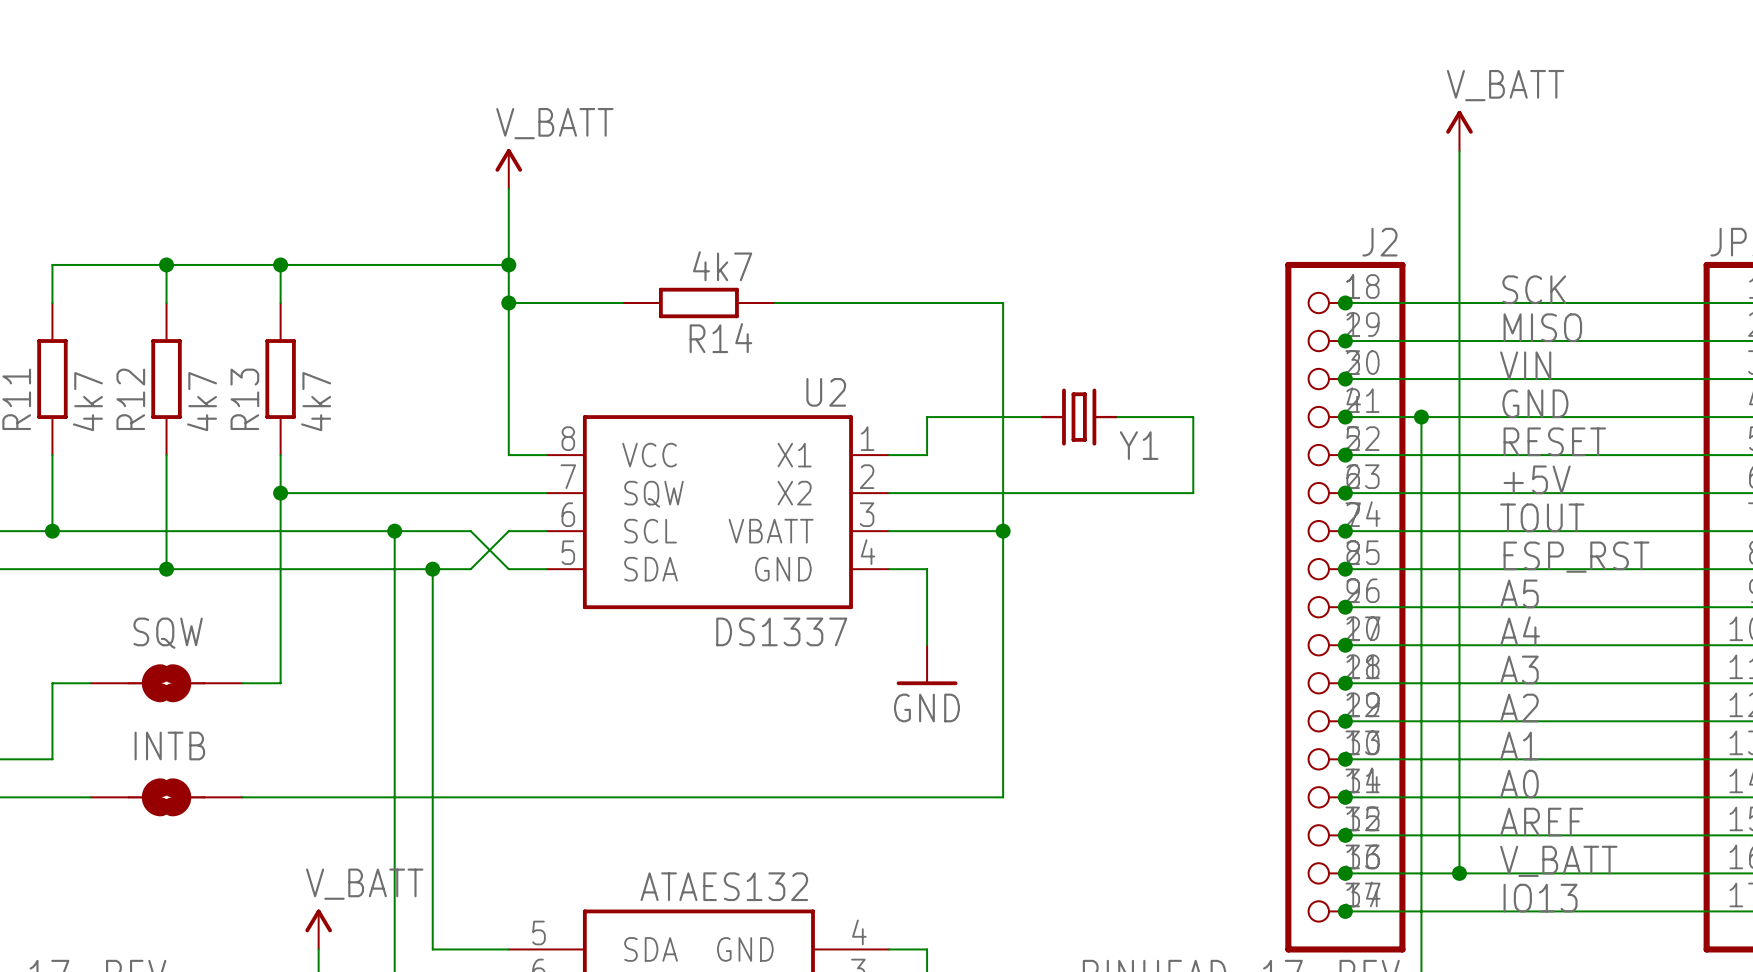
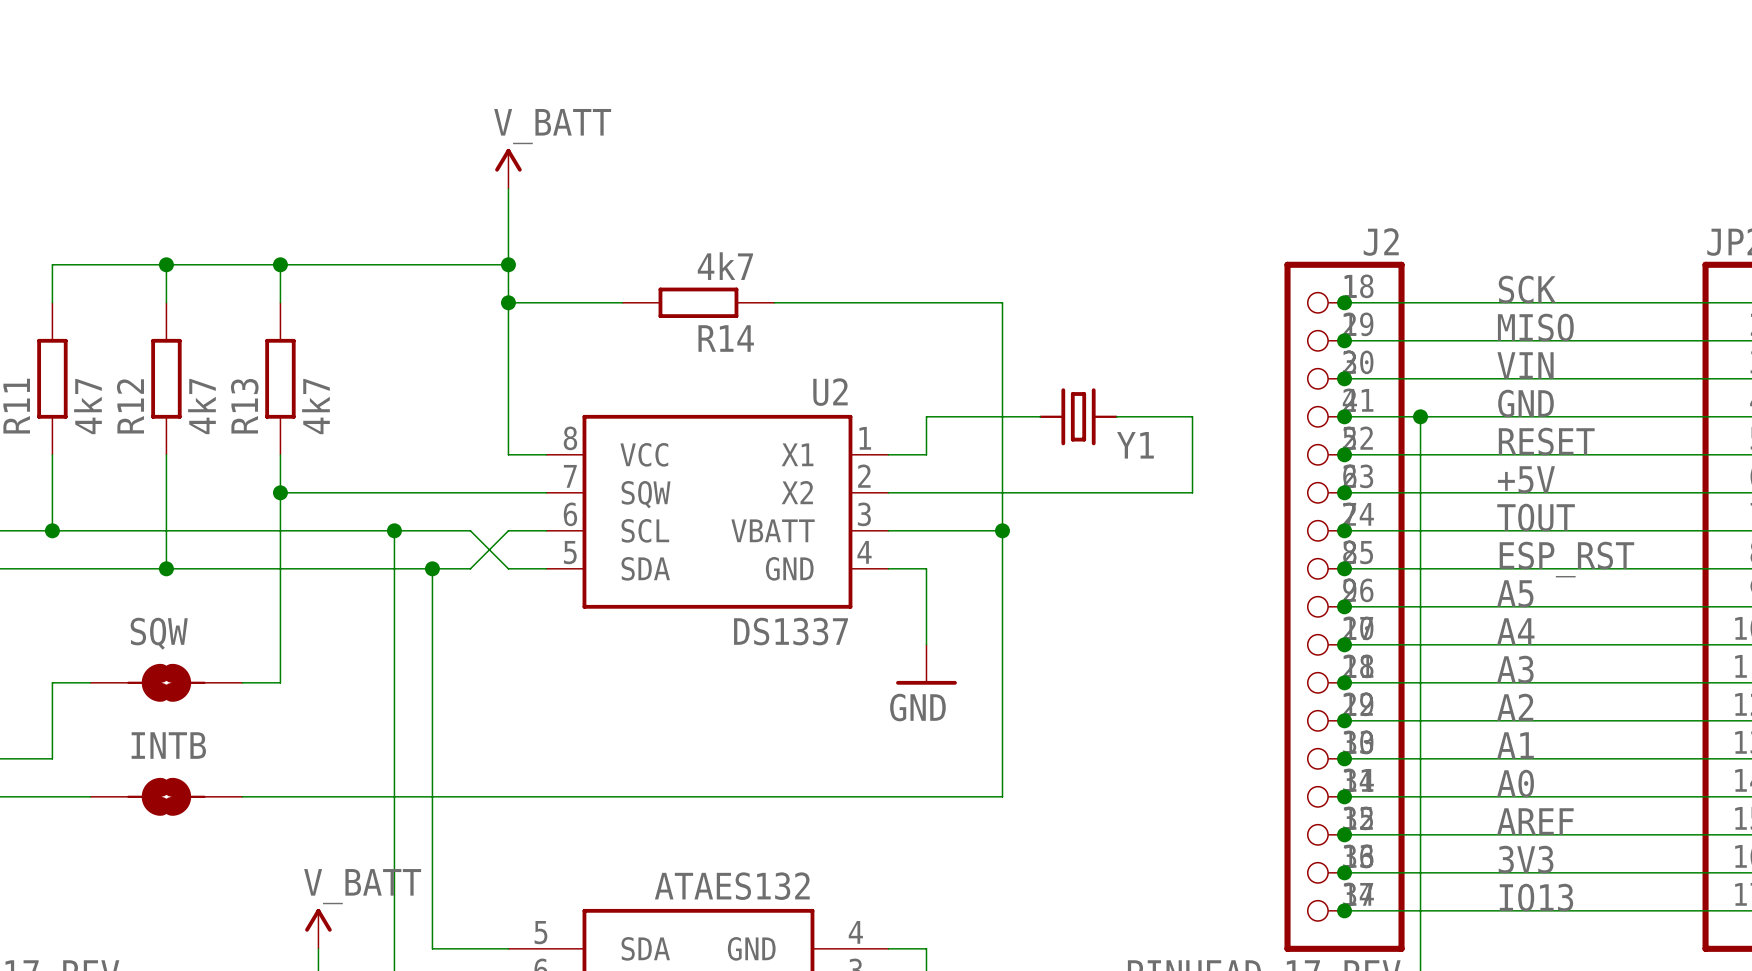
power symbol: V_BATT (1459, 130) -> none
wire: (1459, 150) (1459, 873) -> none
label: V_BATT (1558, 861) -> 3V3 (1526, 859)
junction: (1459, 873) -> none

